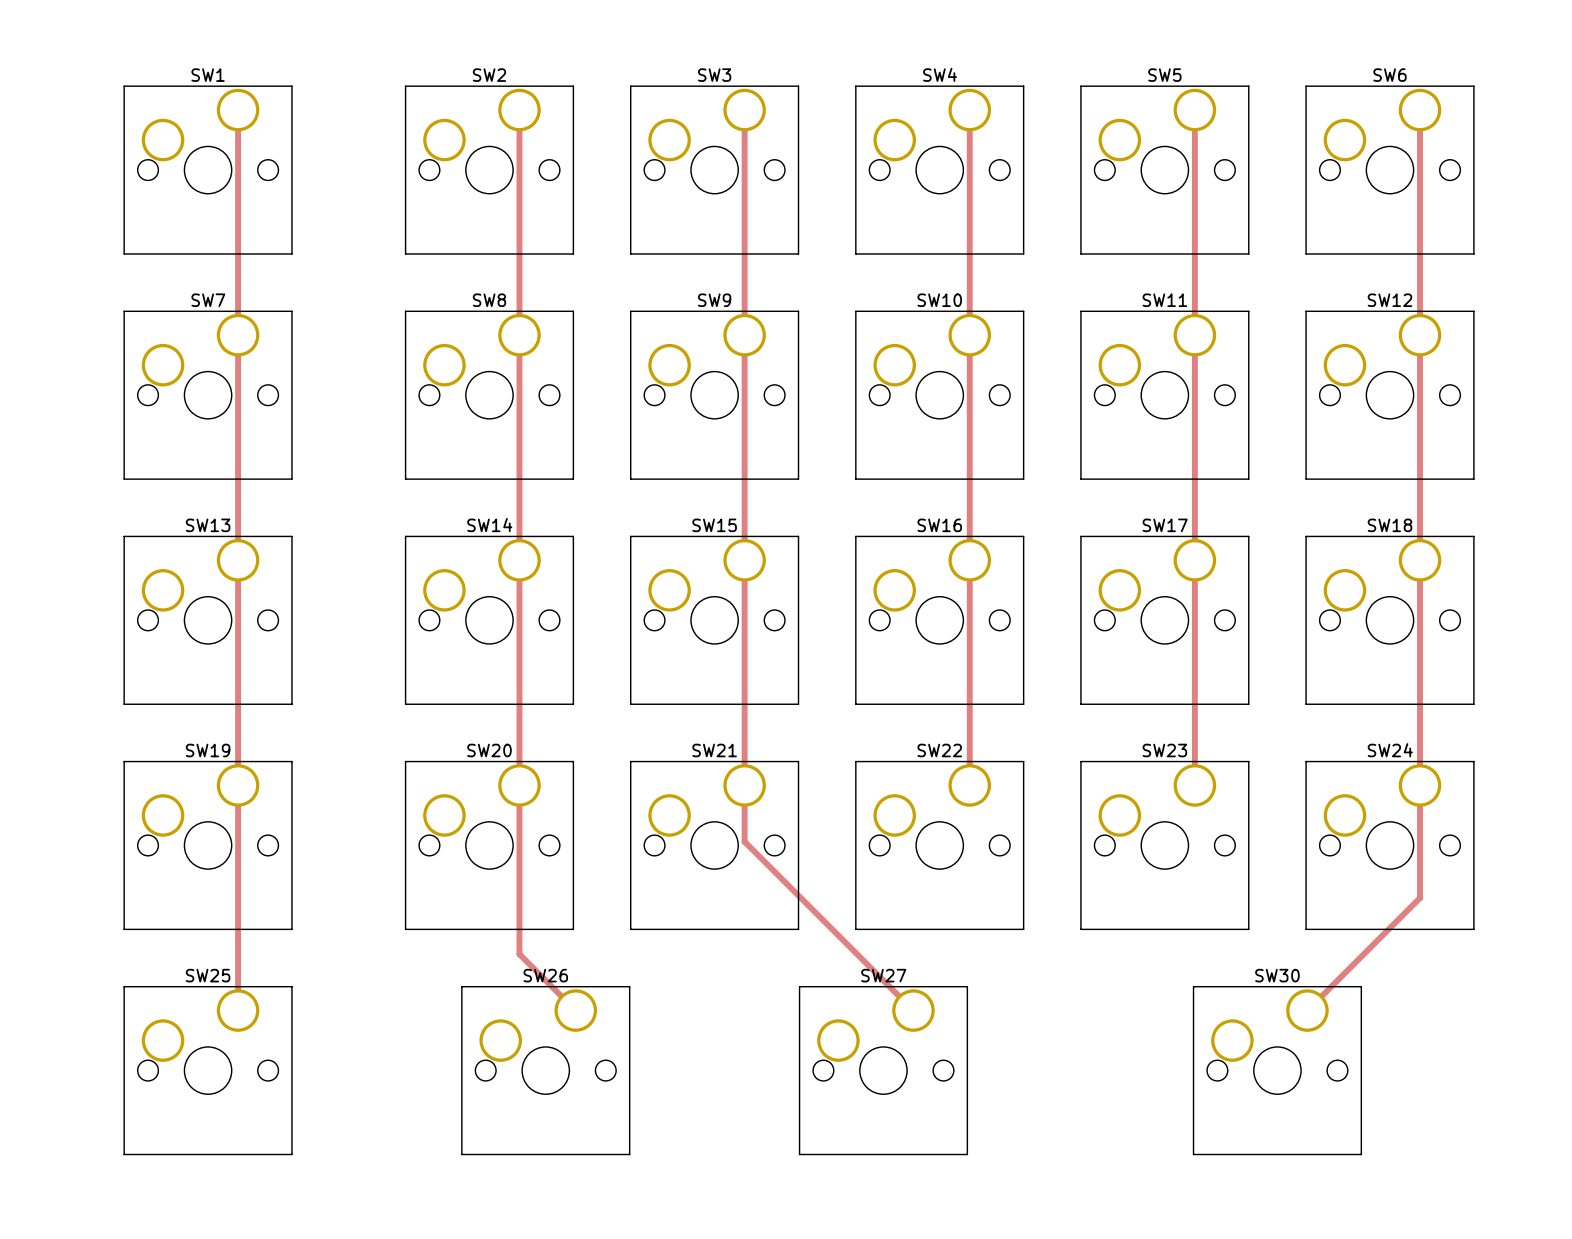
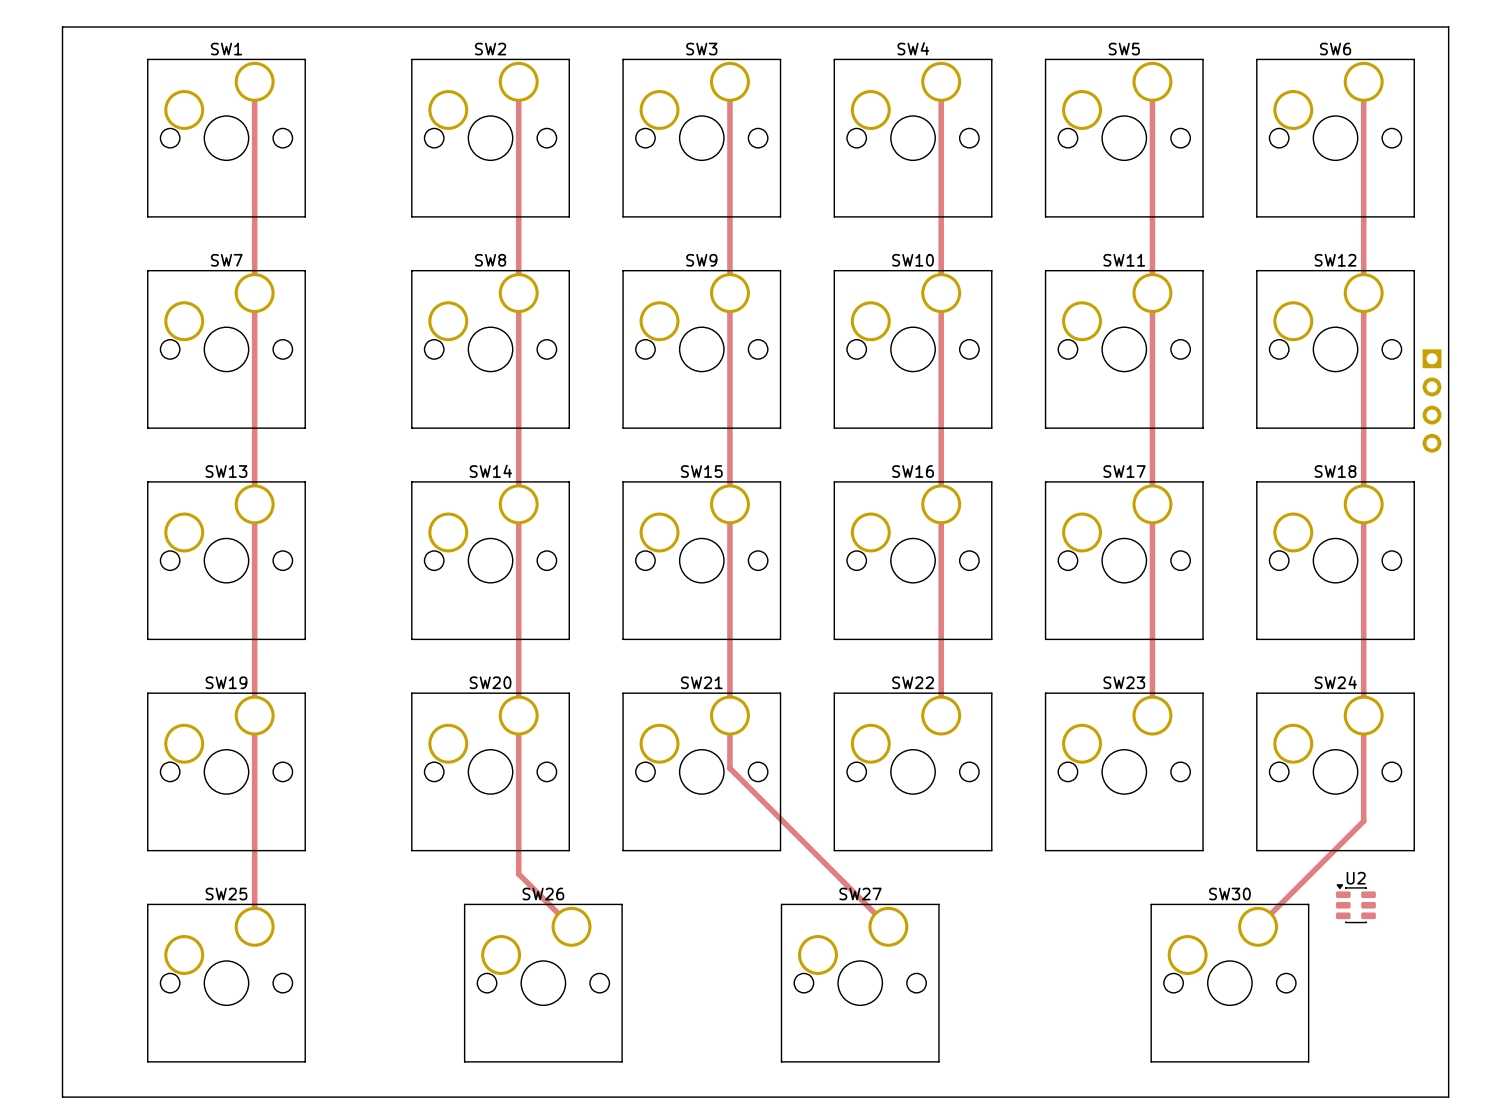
board edge: none -> (62, 26) (1448, 26) (1448, 1097) (62, 1097) (62, 26)
part: none -> (1432, 401)
U2: none -> (1355, 903)

